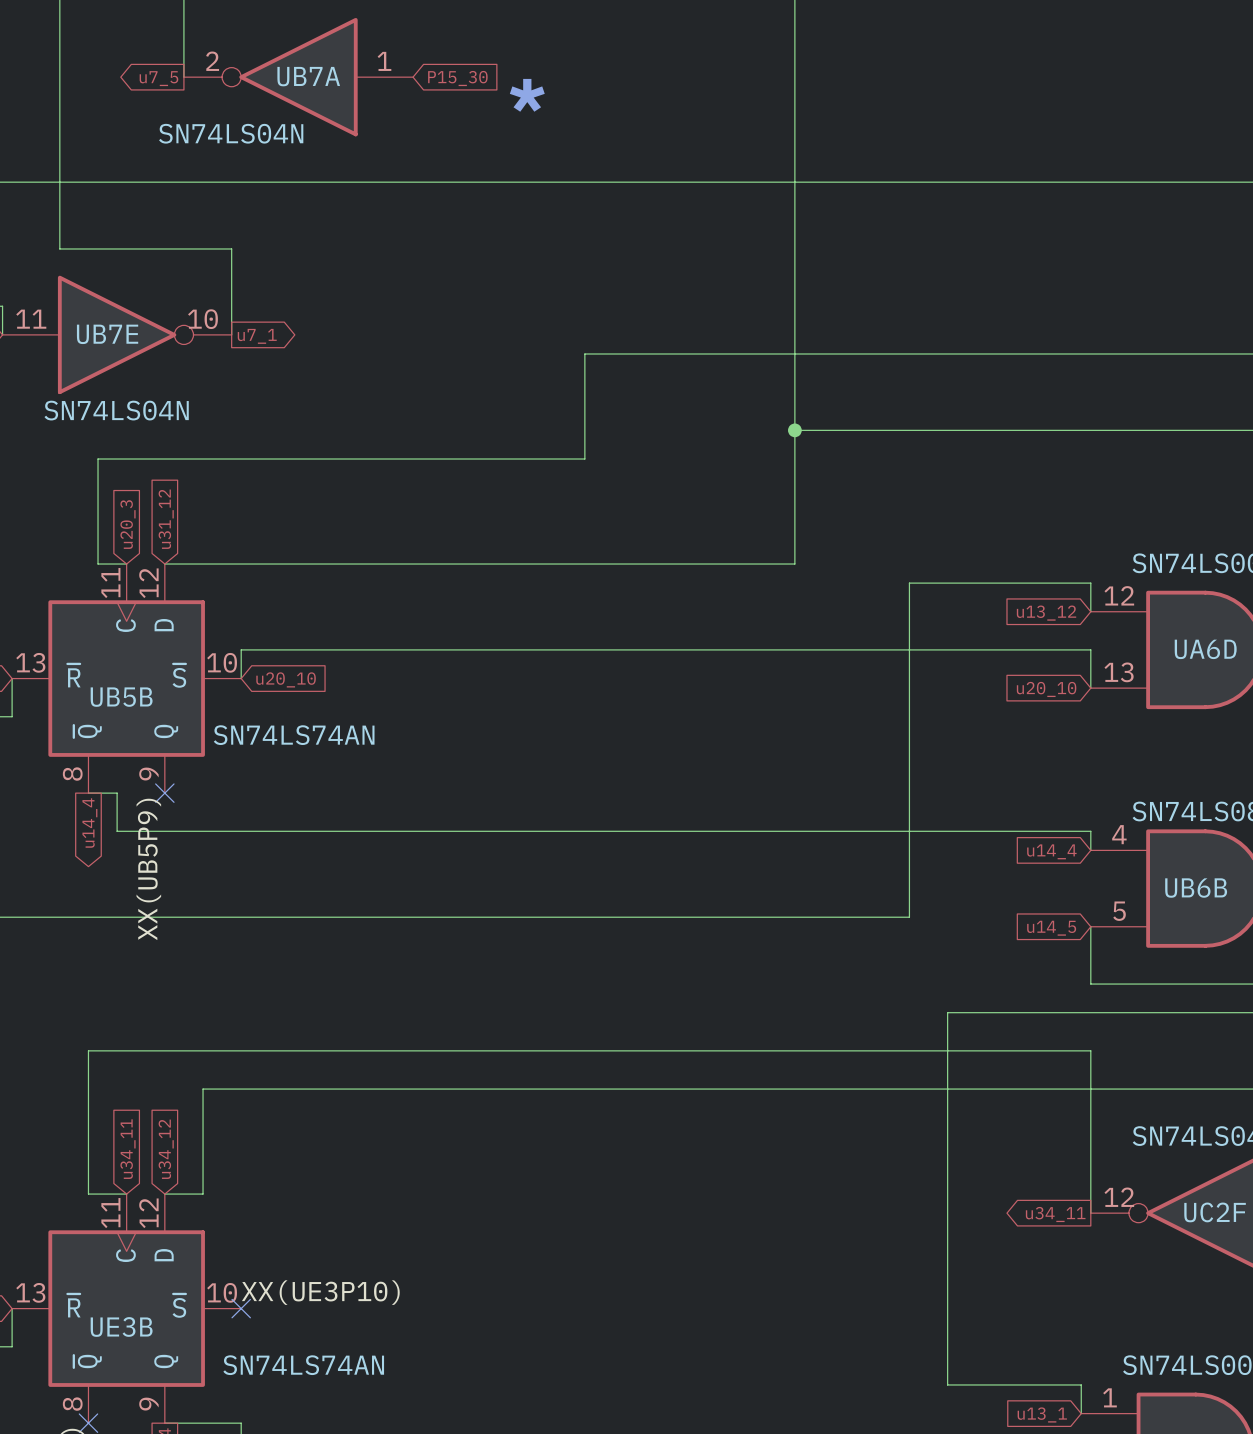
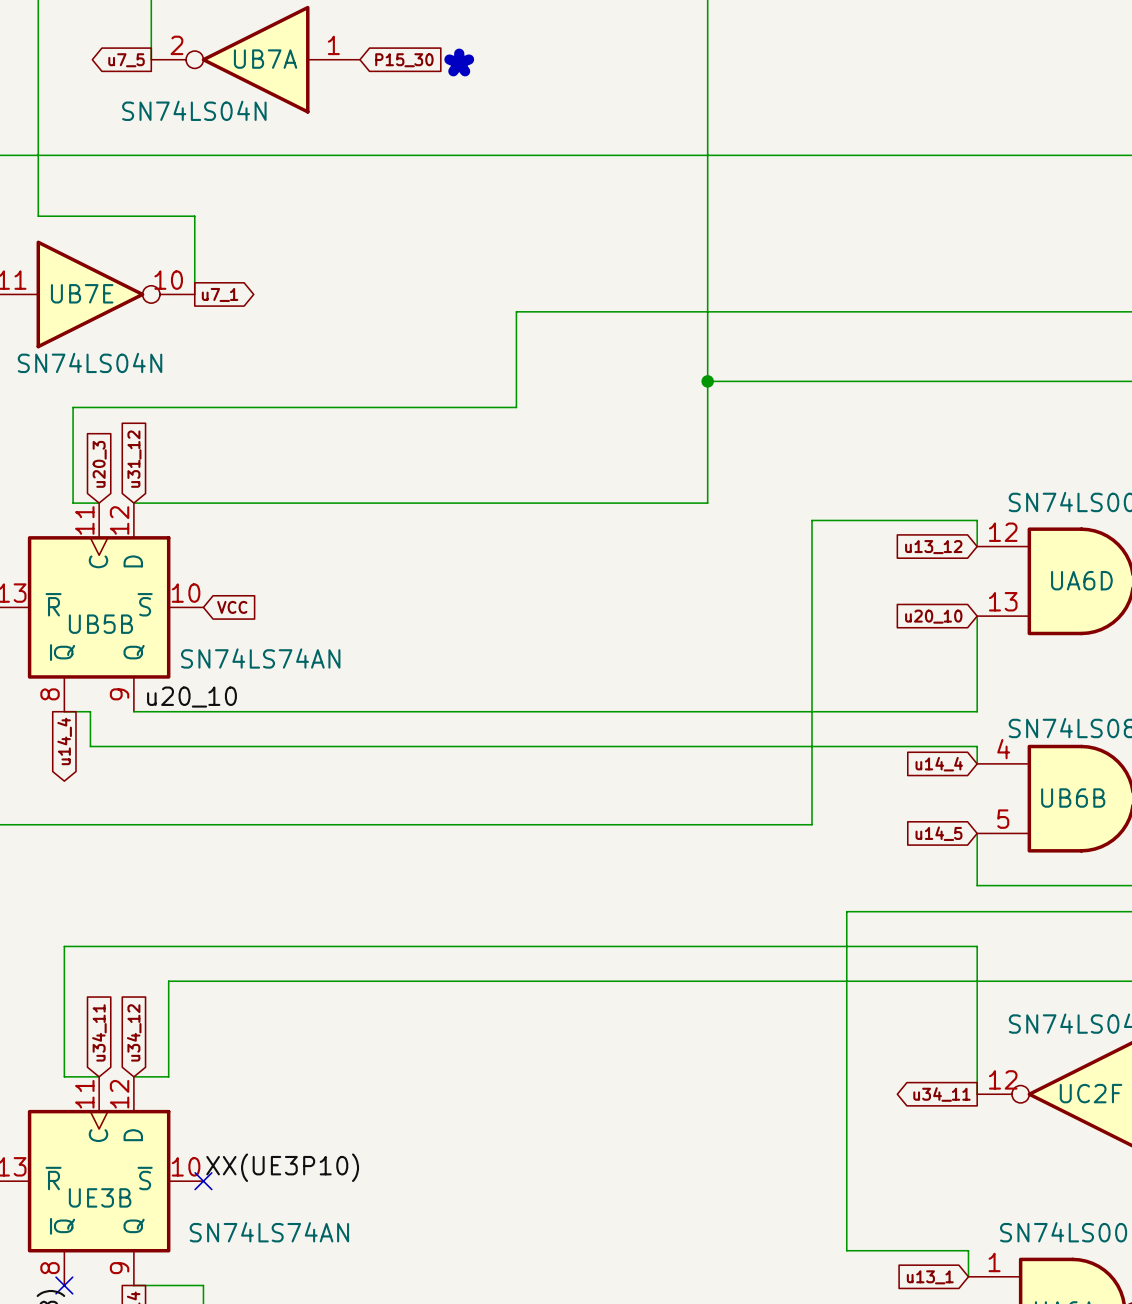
wire: (241, 678) (241, 649) (1090, 649) (1090, 688) -> (133, 711) (977, 711) (977, 616)
global label: u20_10 (286, 679) -> VCC (232, 607)
label: none -> u20_10 (191, 697)
no-connect mark: (164, 793) -> none
label: XX(UB5P9) (148, 869) -> none

